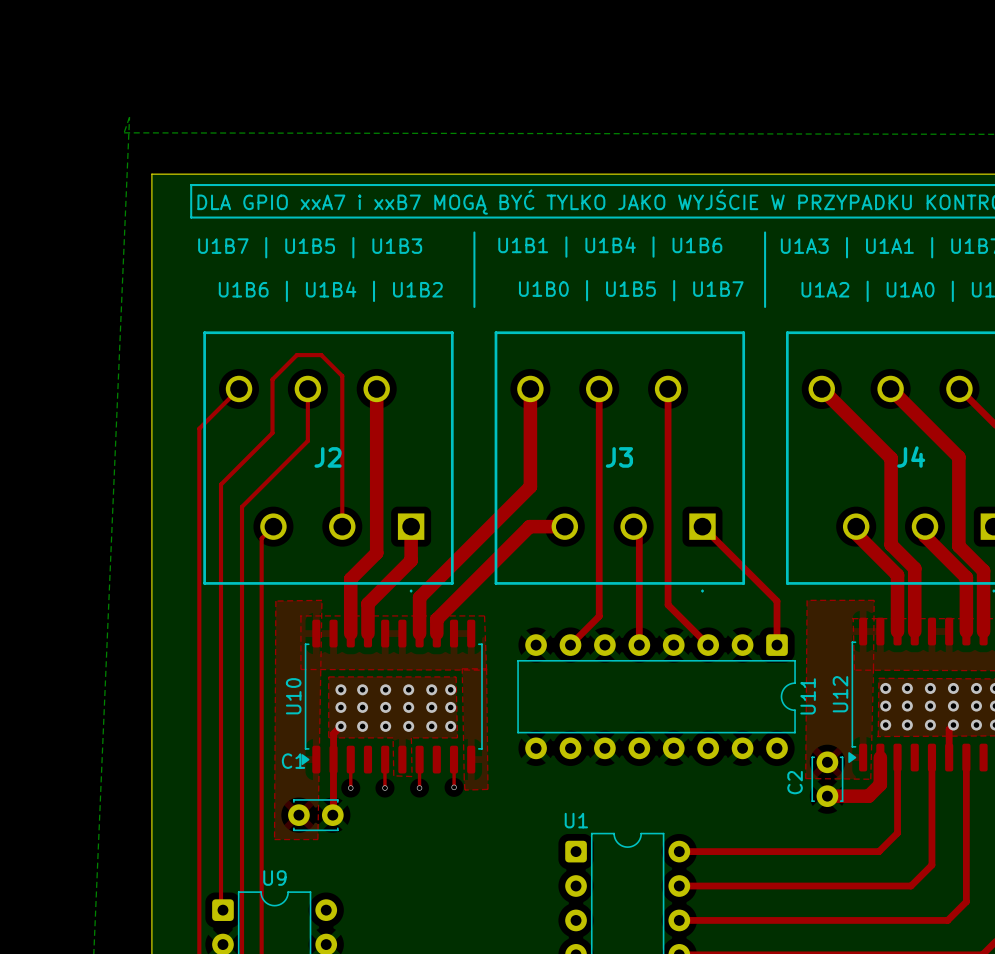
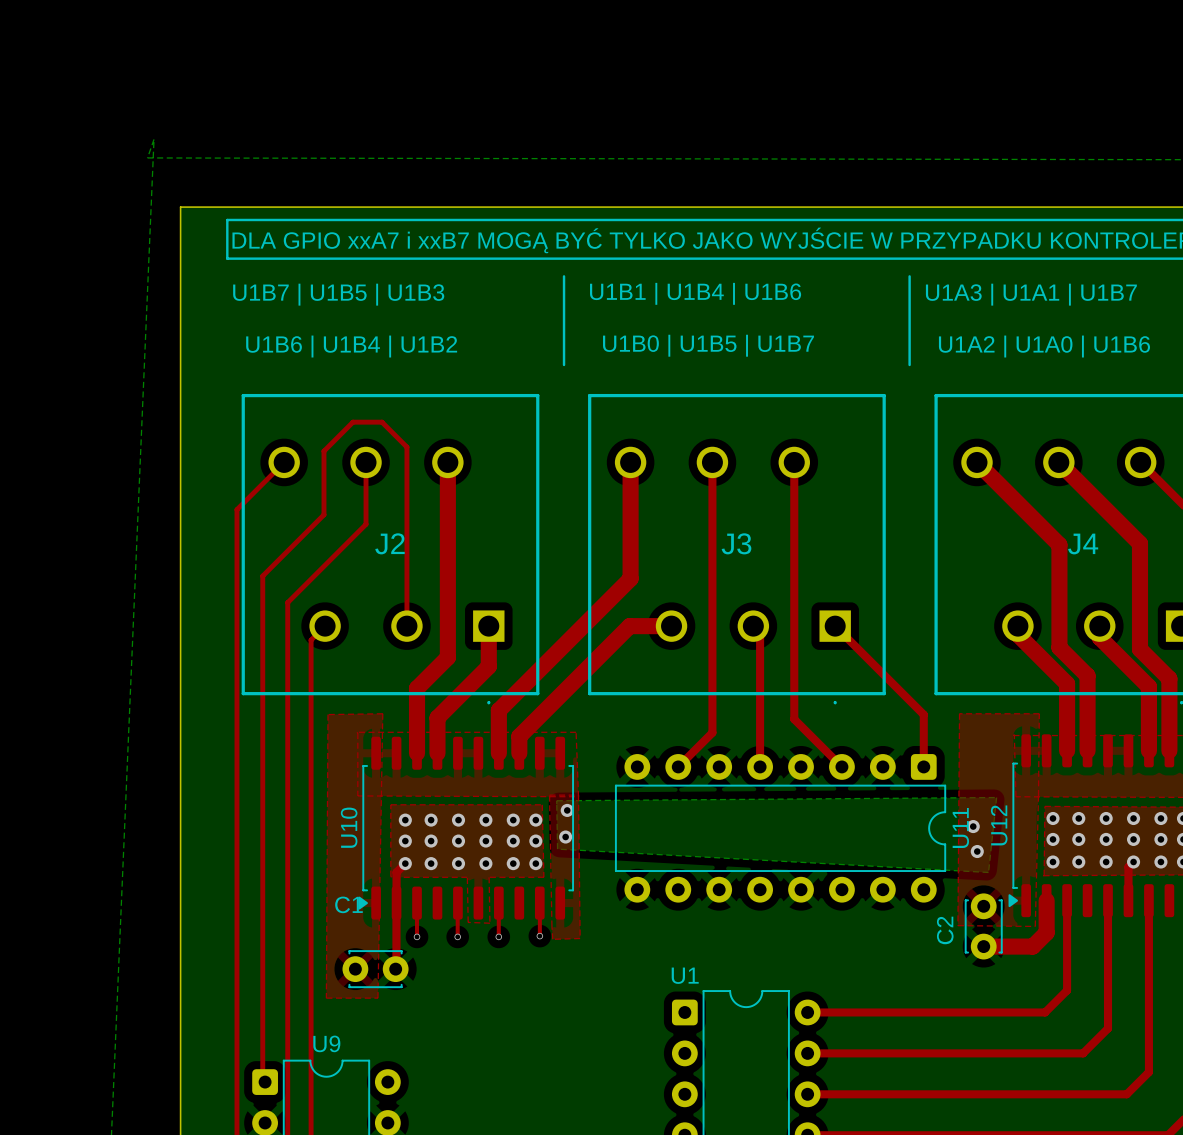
bottom zone outline: none -> (996, 797) (556, 800) (557, 849) (988, 872) (996, 797)
via: none -> (567, 810)
via: none -> (973, 826)
via: none -> (565, 837)
via: none -> (977, 851)

